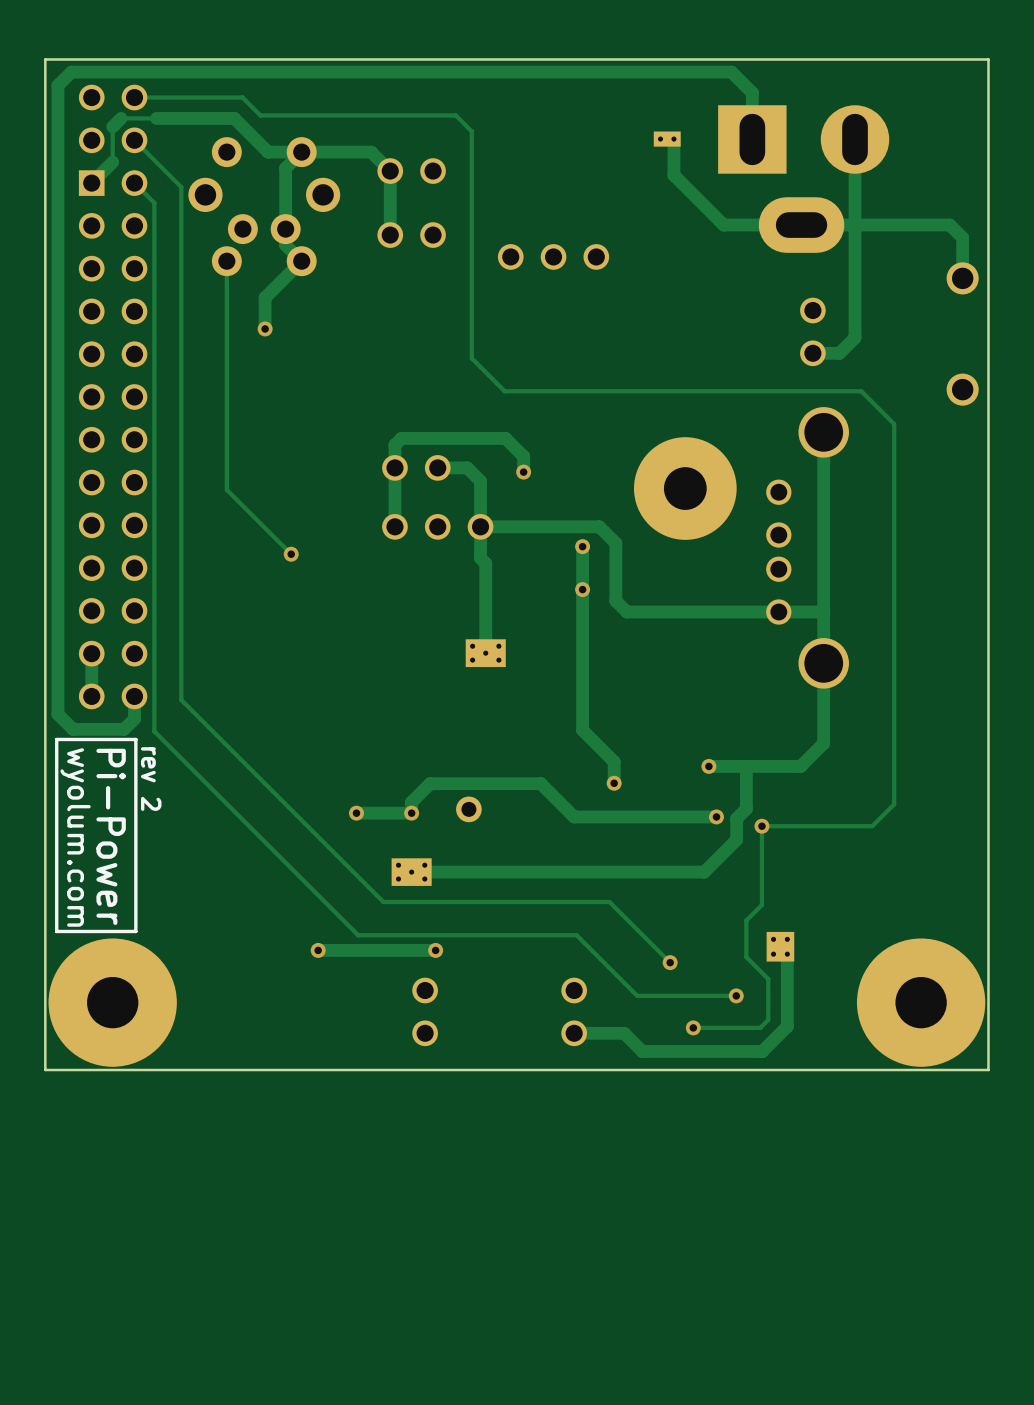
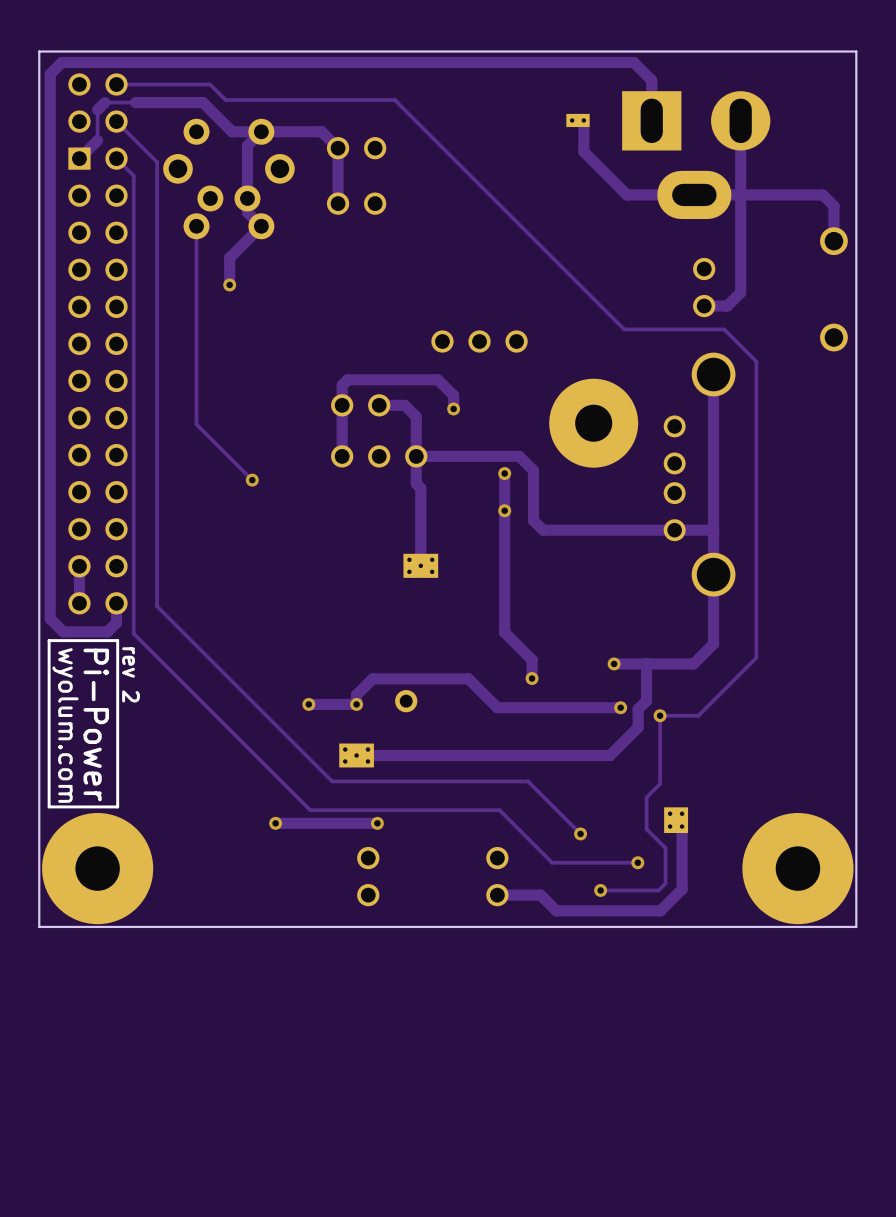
track: (471, 131) (471, 358) (504, 391) (861, 391) (894, 424) (894, 804) (872, 826) (806, 826) -> (408, 113) (624, 329) (724, 329) (756, 361) (756, 657) (698, 715)
part position: (553, 256) -> (479, 341)

